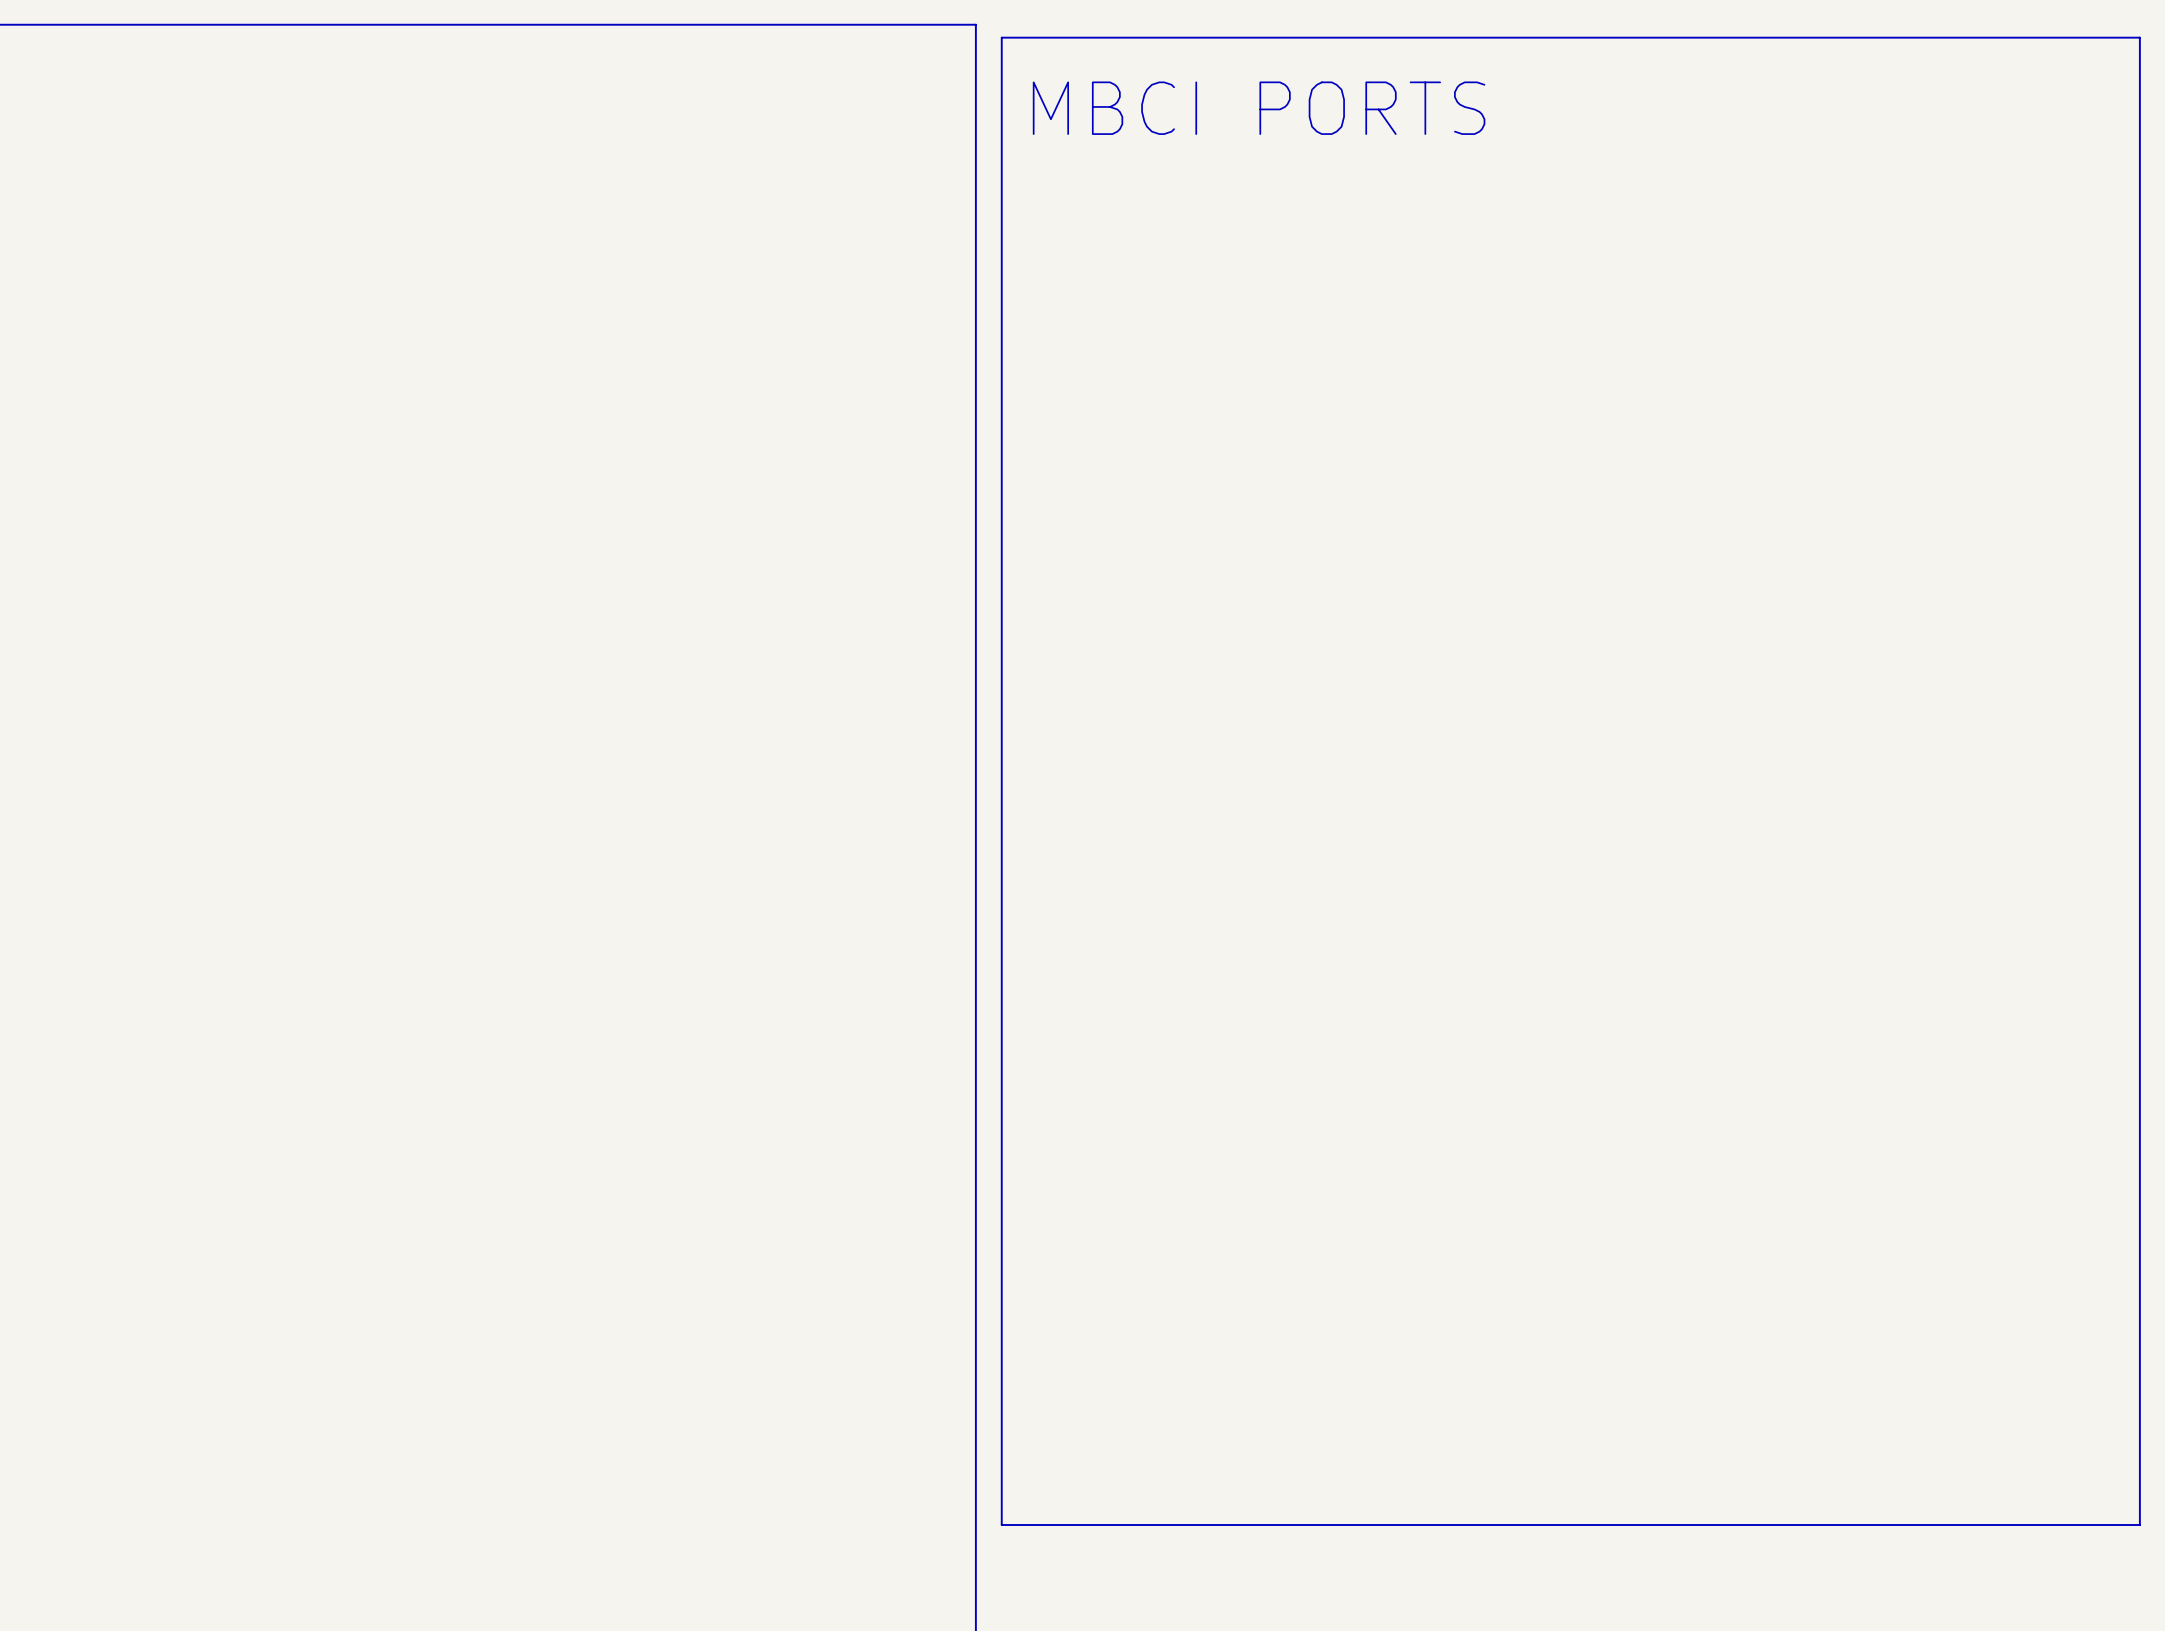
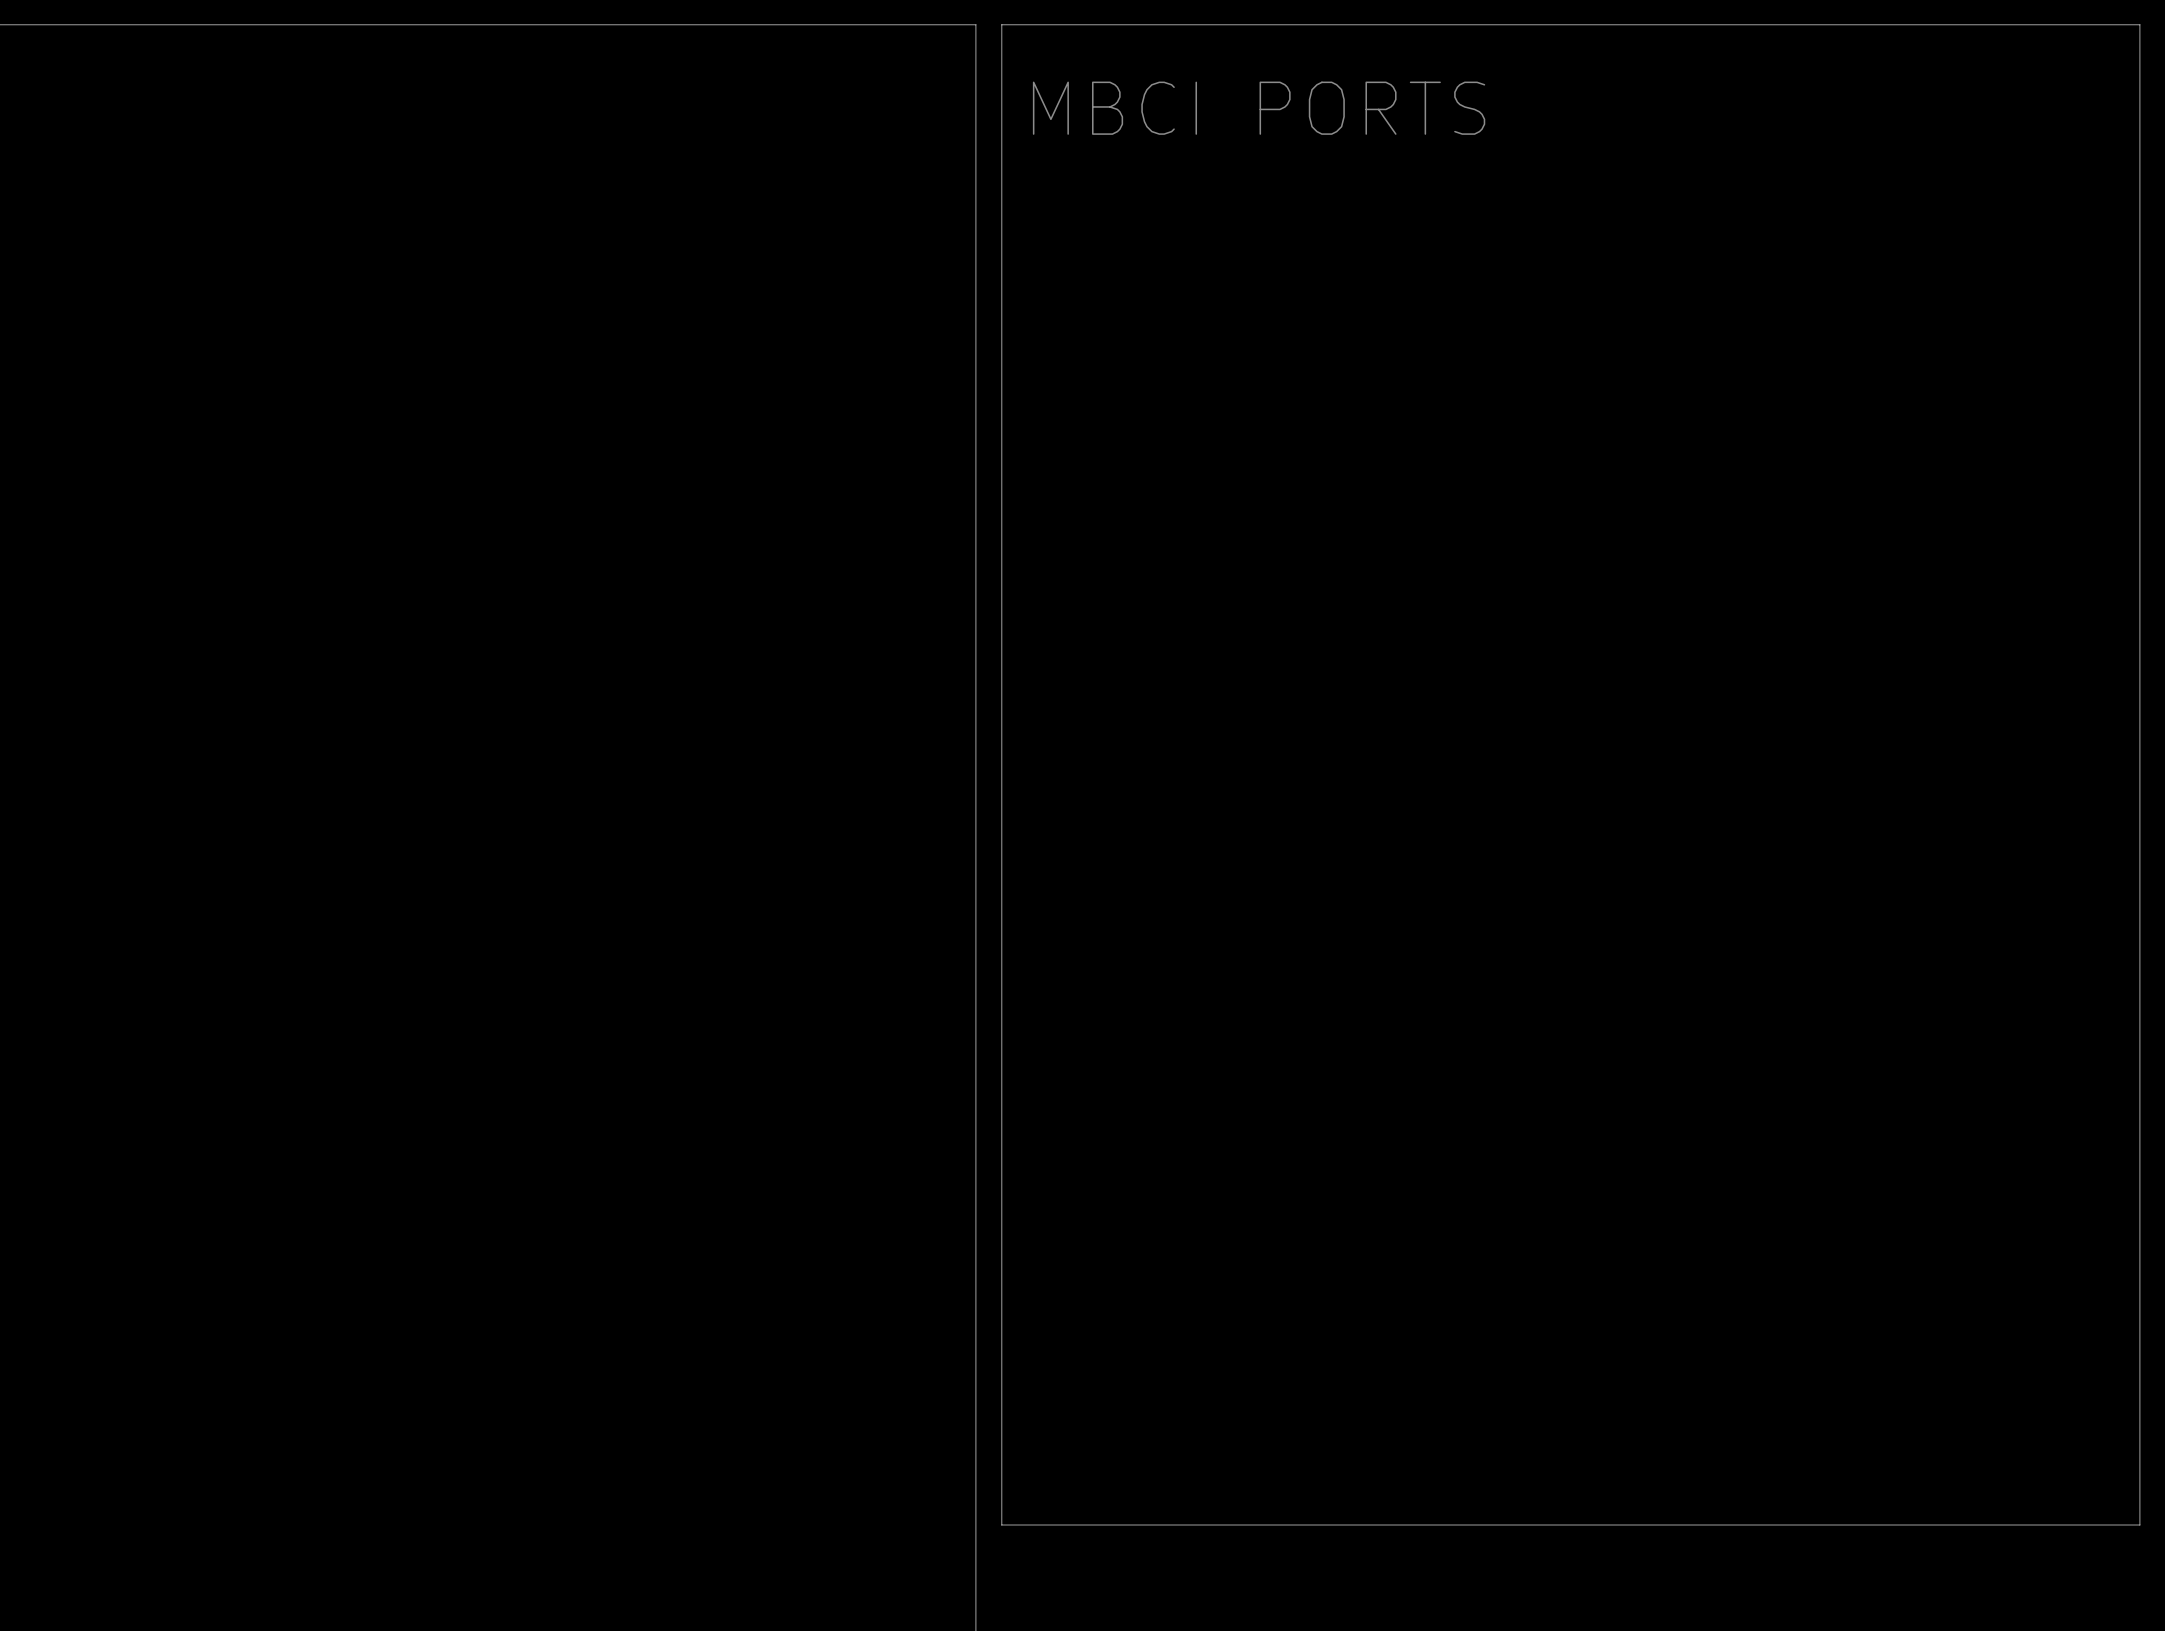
line: (1001, 37) (2139, 37) -> (1001, 37) (1001, 24) (2139, 24) (2139, 37)

